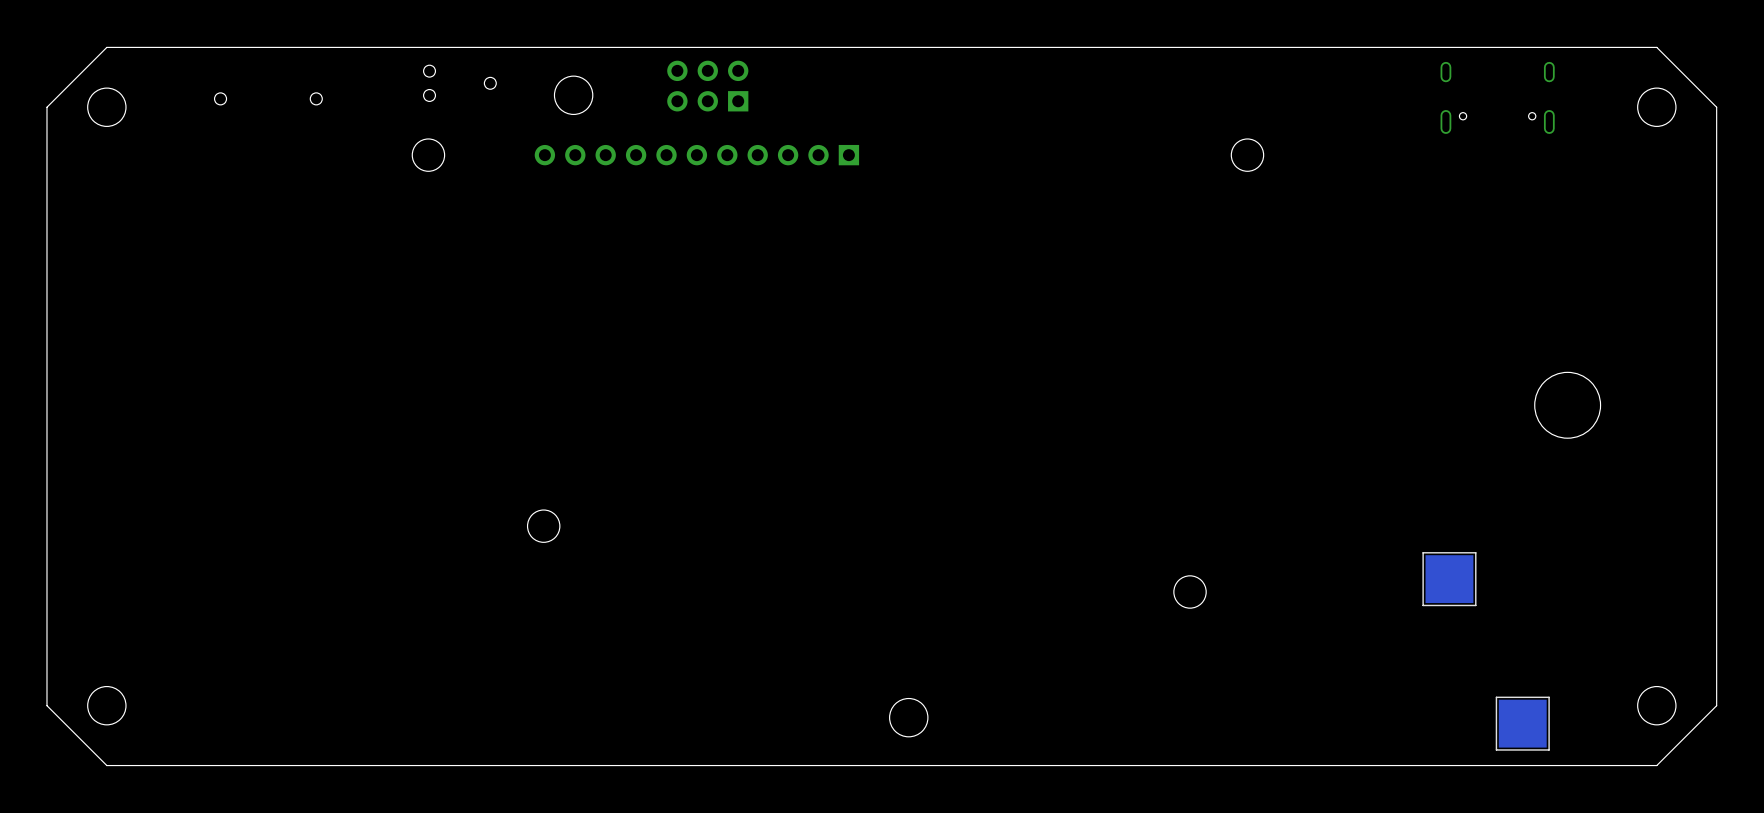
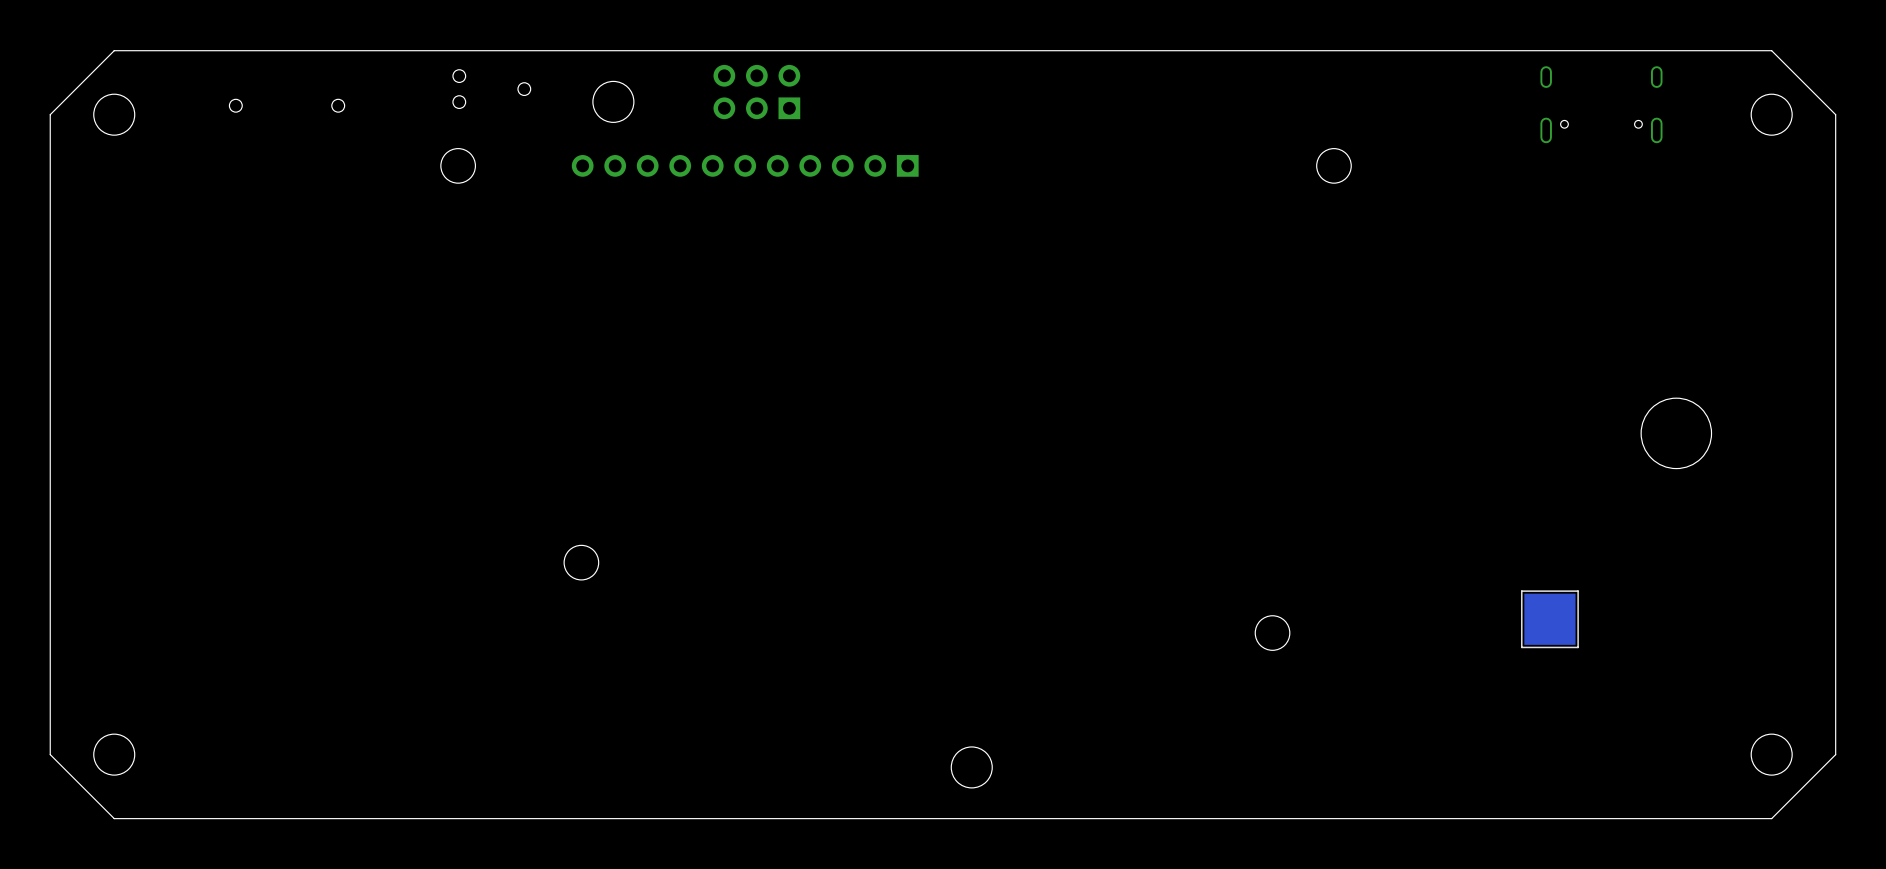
part: (1522, 723) -> none

